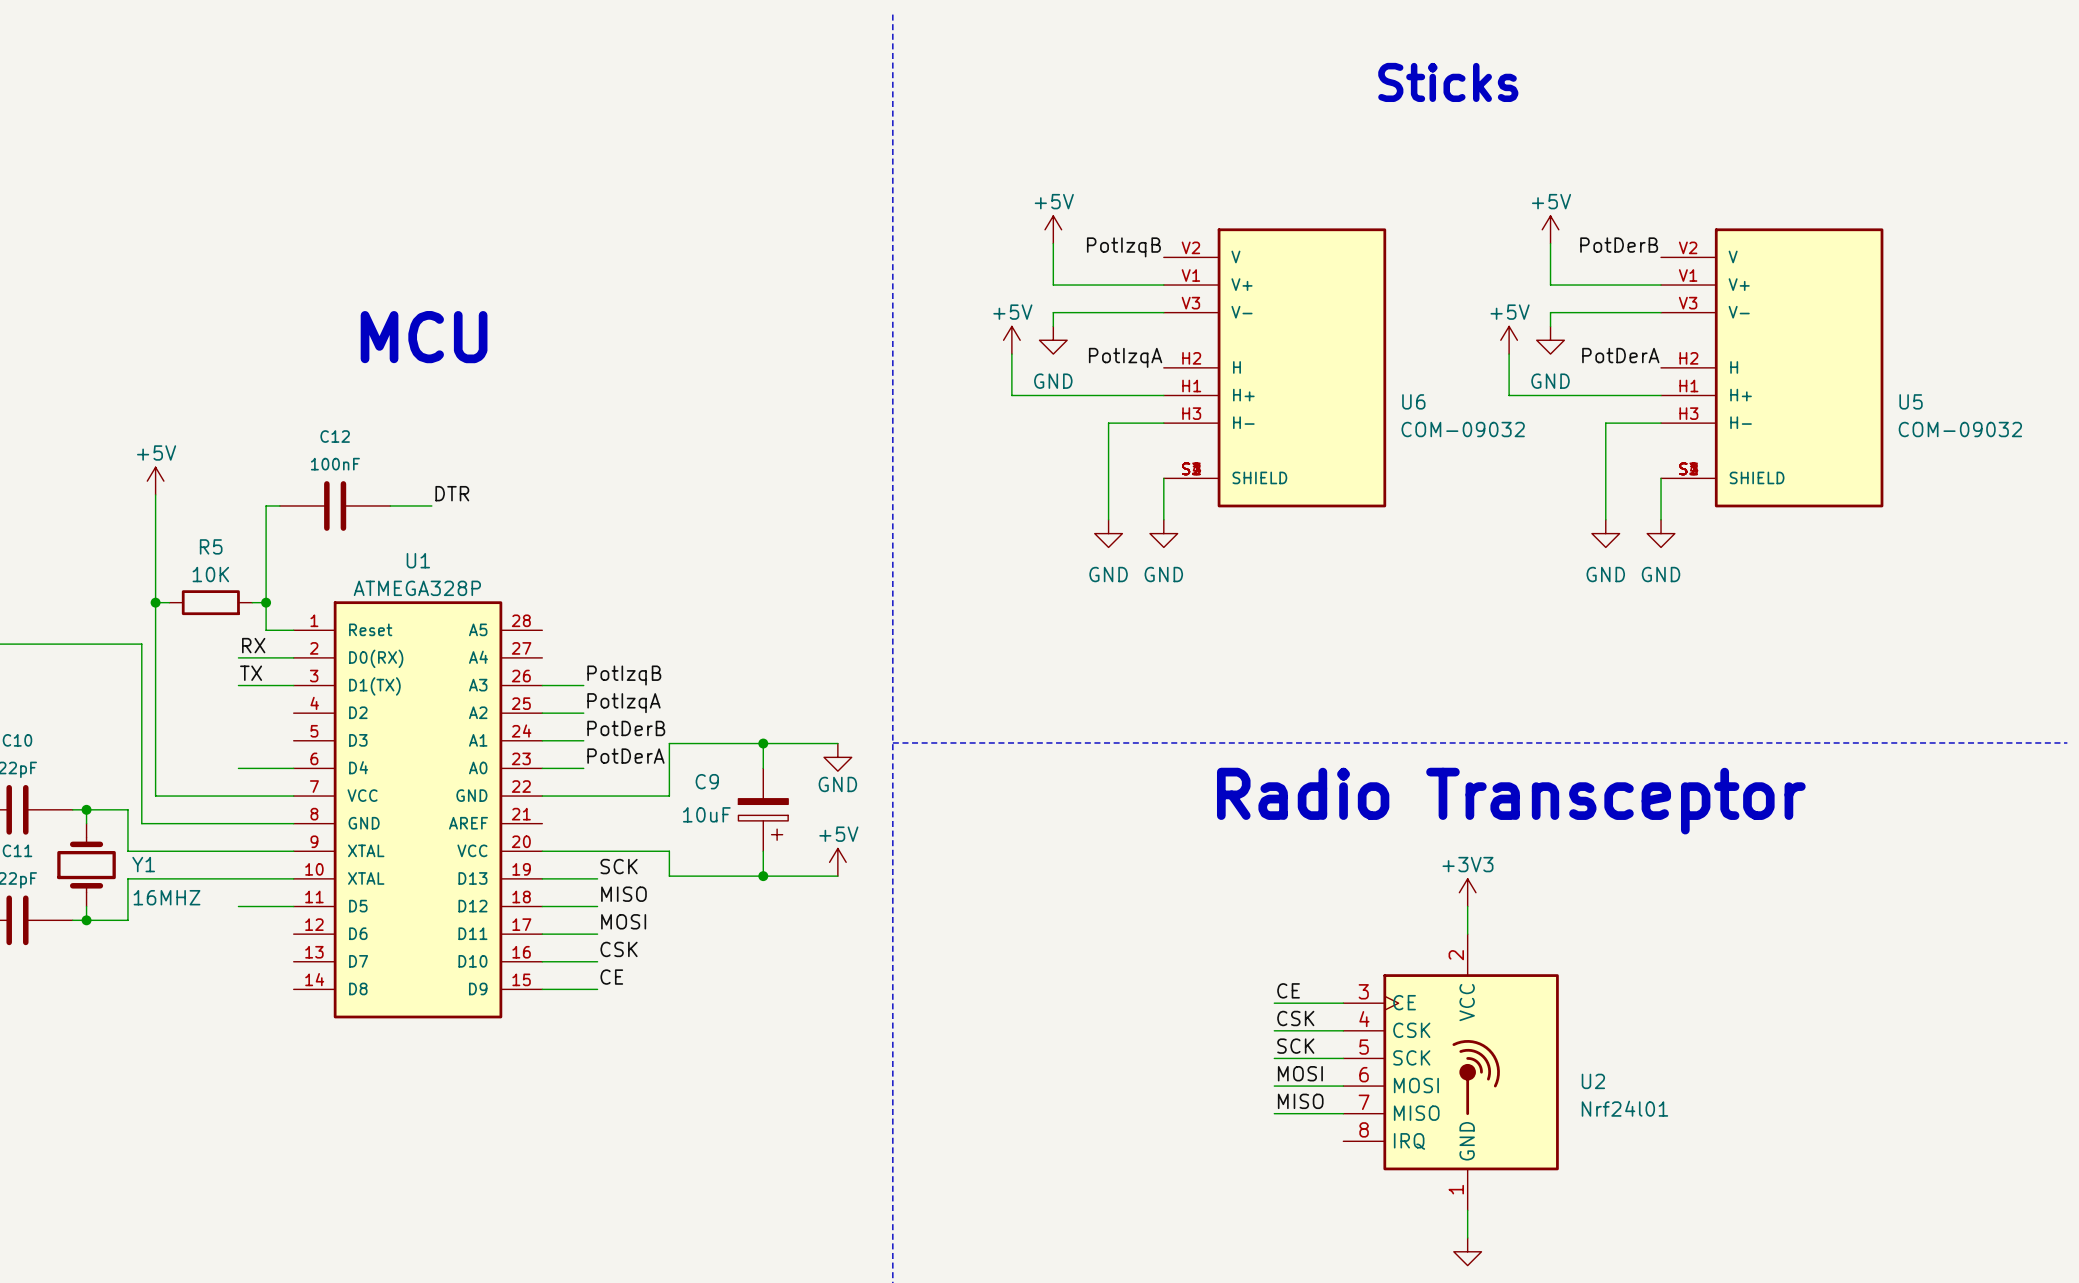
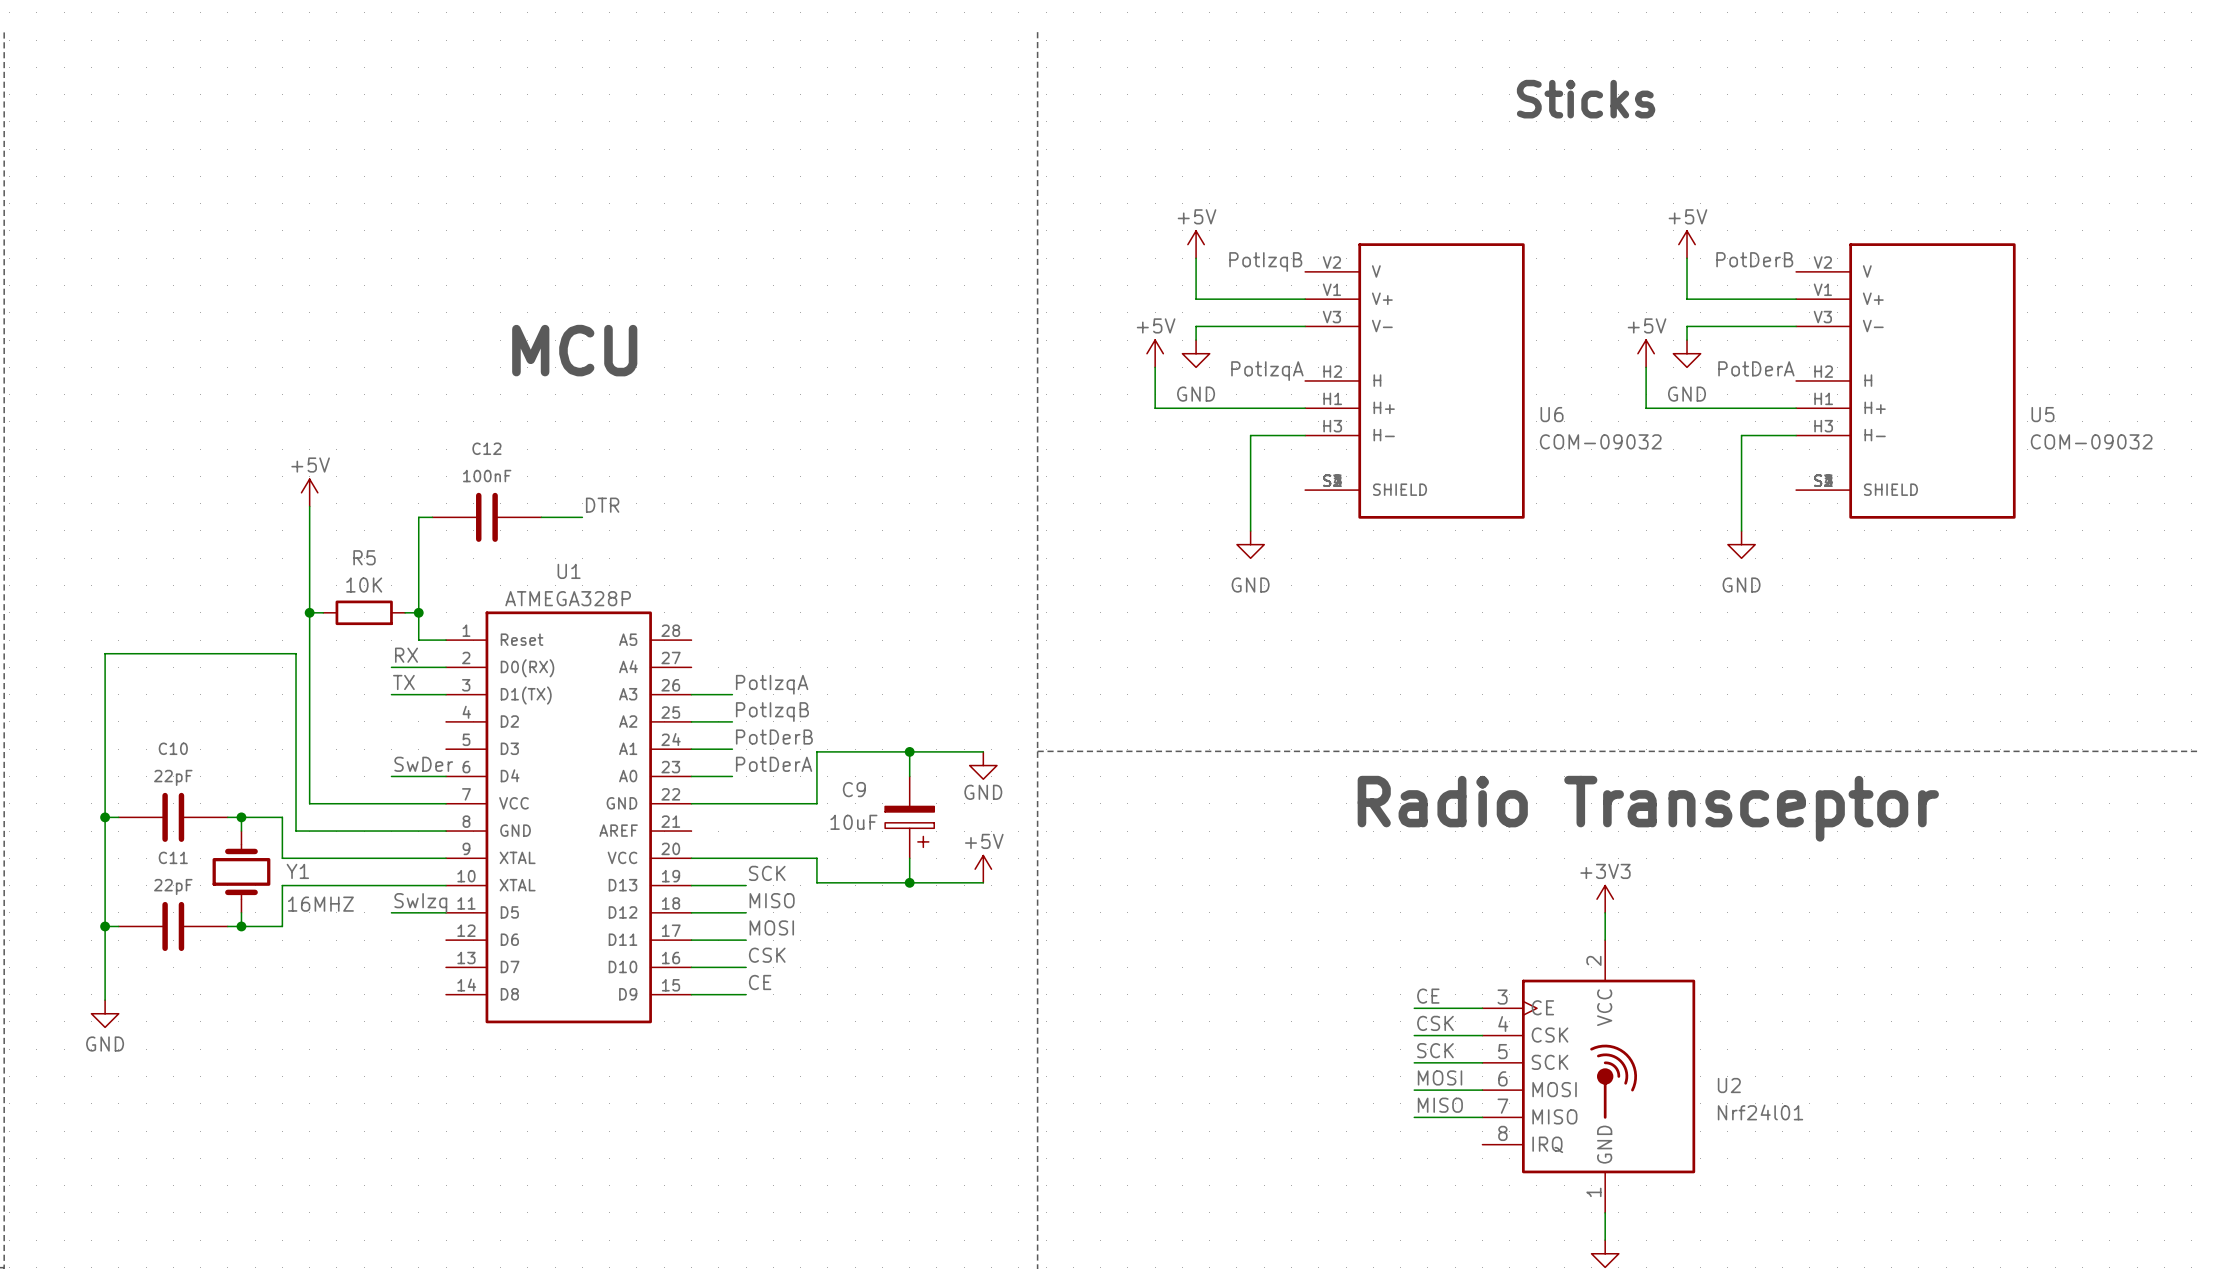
wire: (1163, 478) (1163, 519) -> none
wire: (1661, 478) (1661, 519) -> none
power symbol: GND (1163, 533) -> none
power symbol: GND (1661, 533) -> none
label: PotIzqB (624, 675) -> PotIzqA (772, 684)
label: PotIzqA (623, 703) -> PotIzqB (772, 712)
label: none -> SwDer (423, 764)
label: none -> SwIzq (420, 902)

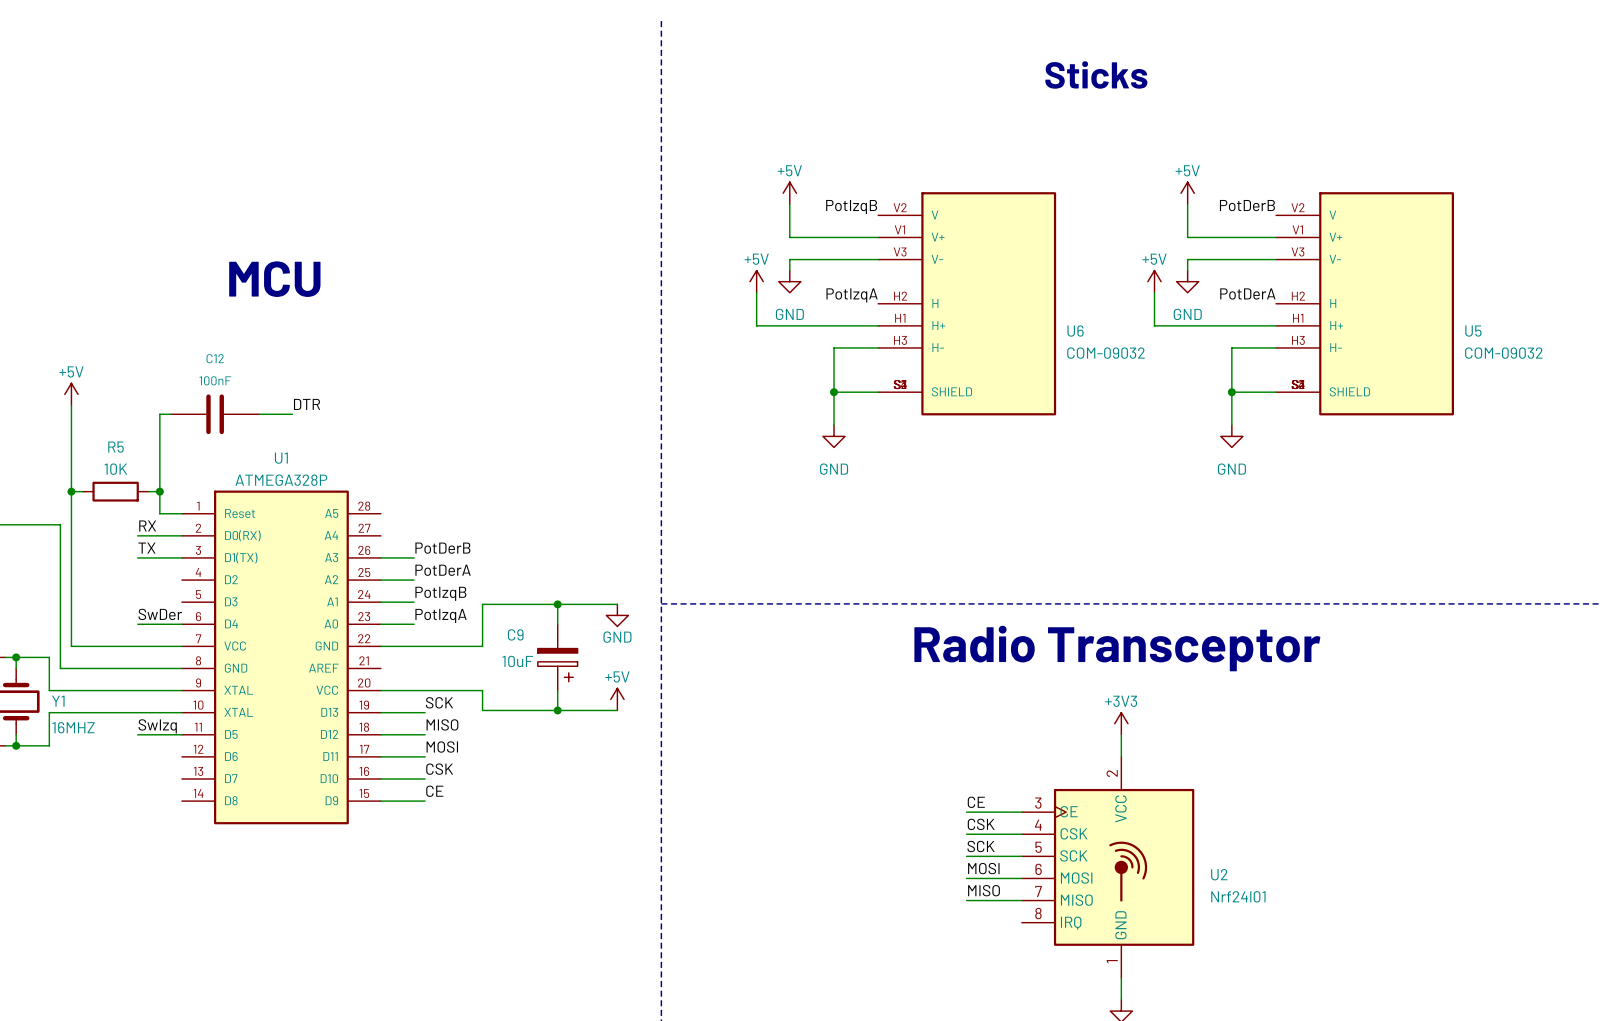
wire: none -> (834, 392) (878, 392)
junction: none -> (834, 392)
wire: none -> (1231, 392) (1276, 392)
junction: none -> (1231, 392)
label: PotIzqA (772, 684) -> PotDerB (442, 548)
label: PotIzqB (772, 712) -> PotDerA (443, 570)
label: PotDerB (774, 737) -> PotIzqB (440, 593)
label: PotDerA (774, 764) -> PotIzqA (441, 615)

